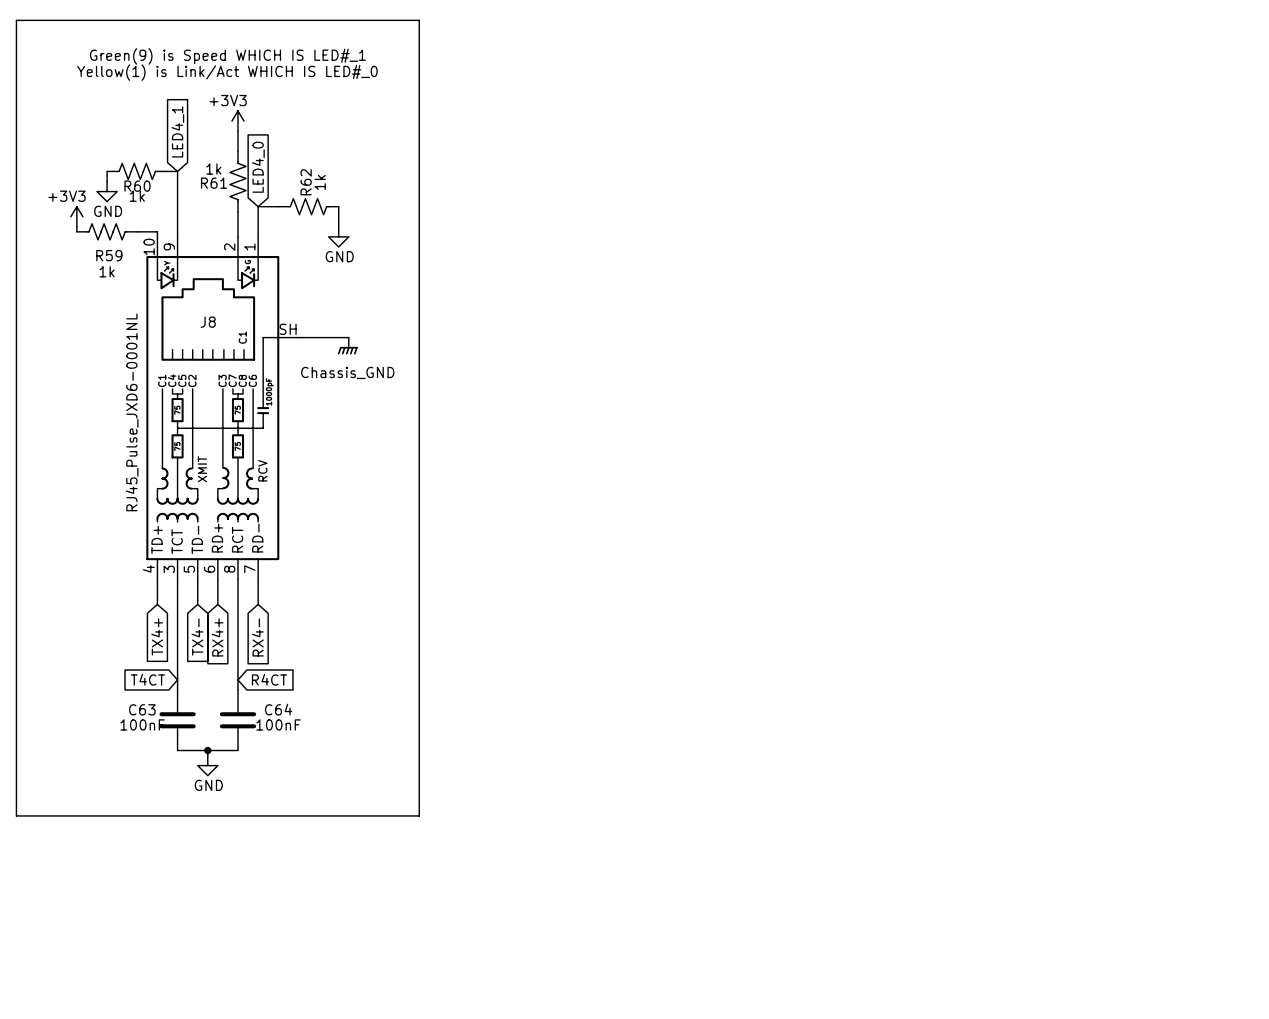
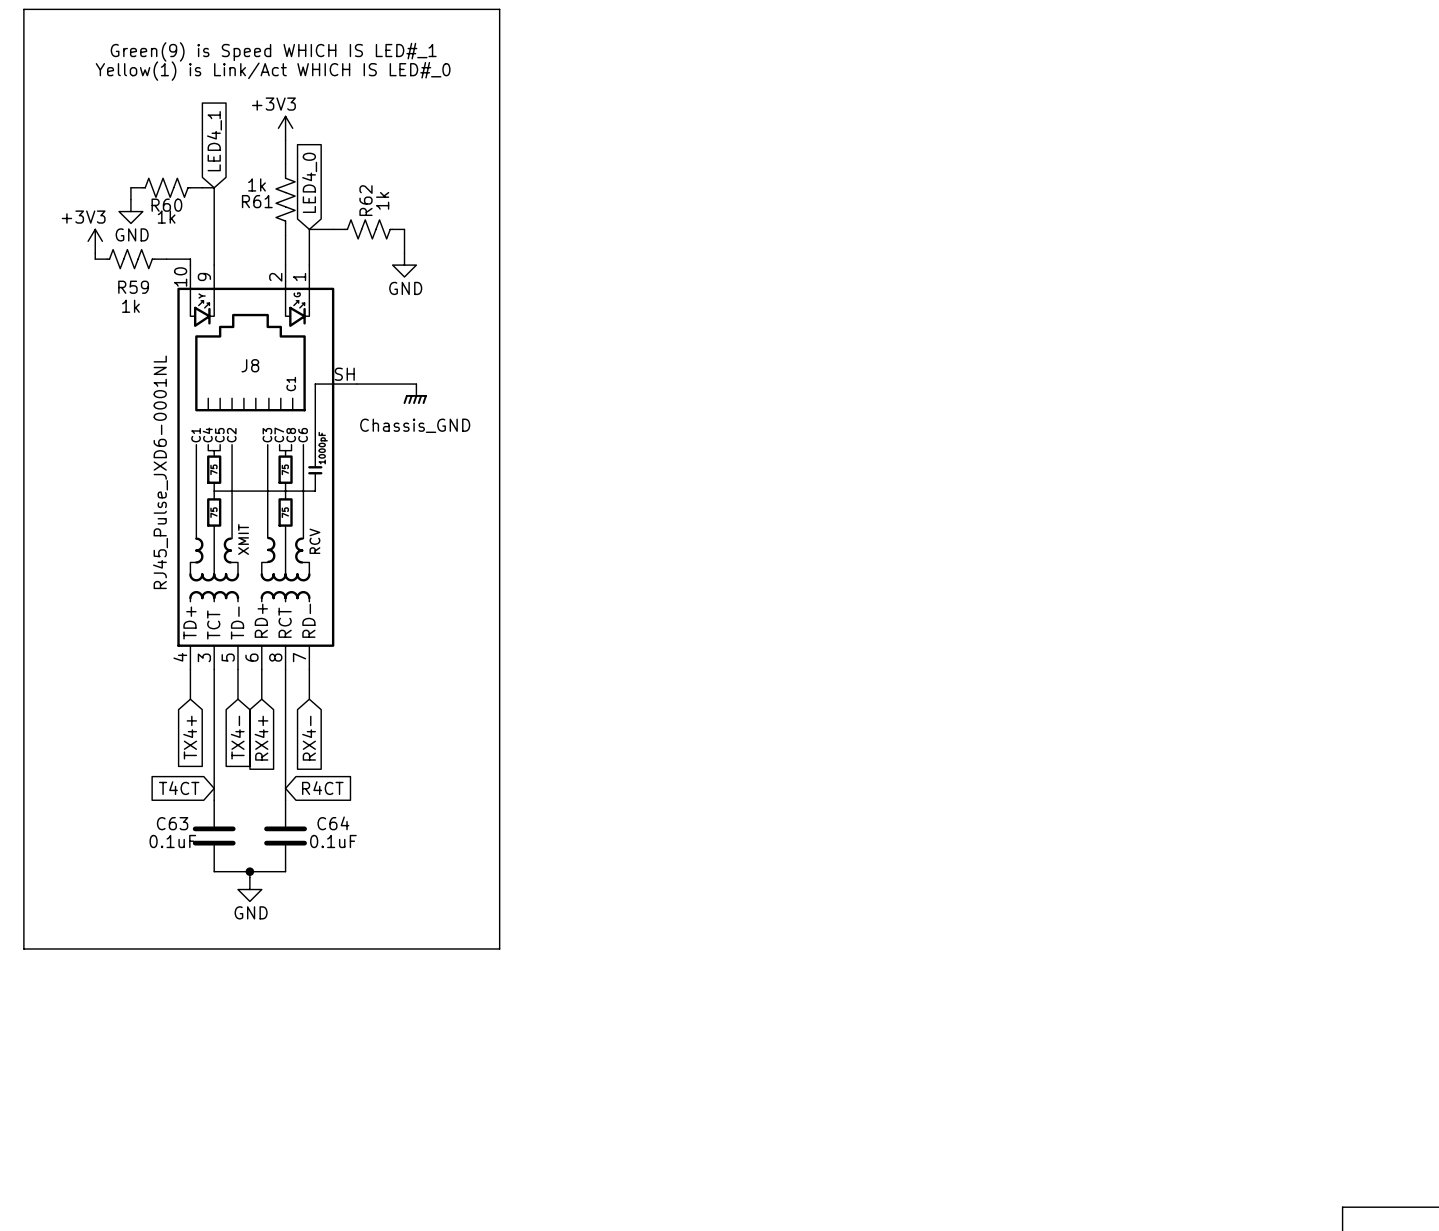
C63 value: 100nF (142, 724) -> 0.1uF (172, 841)
C64 value: 100nF (278, 724) -> 0.1uF (333, 841)

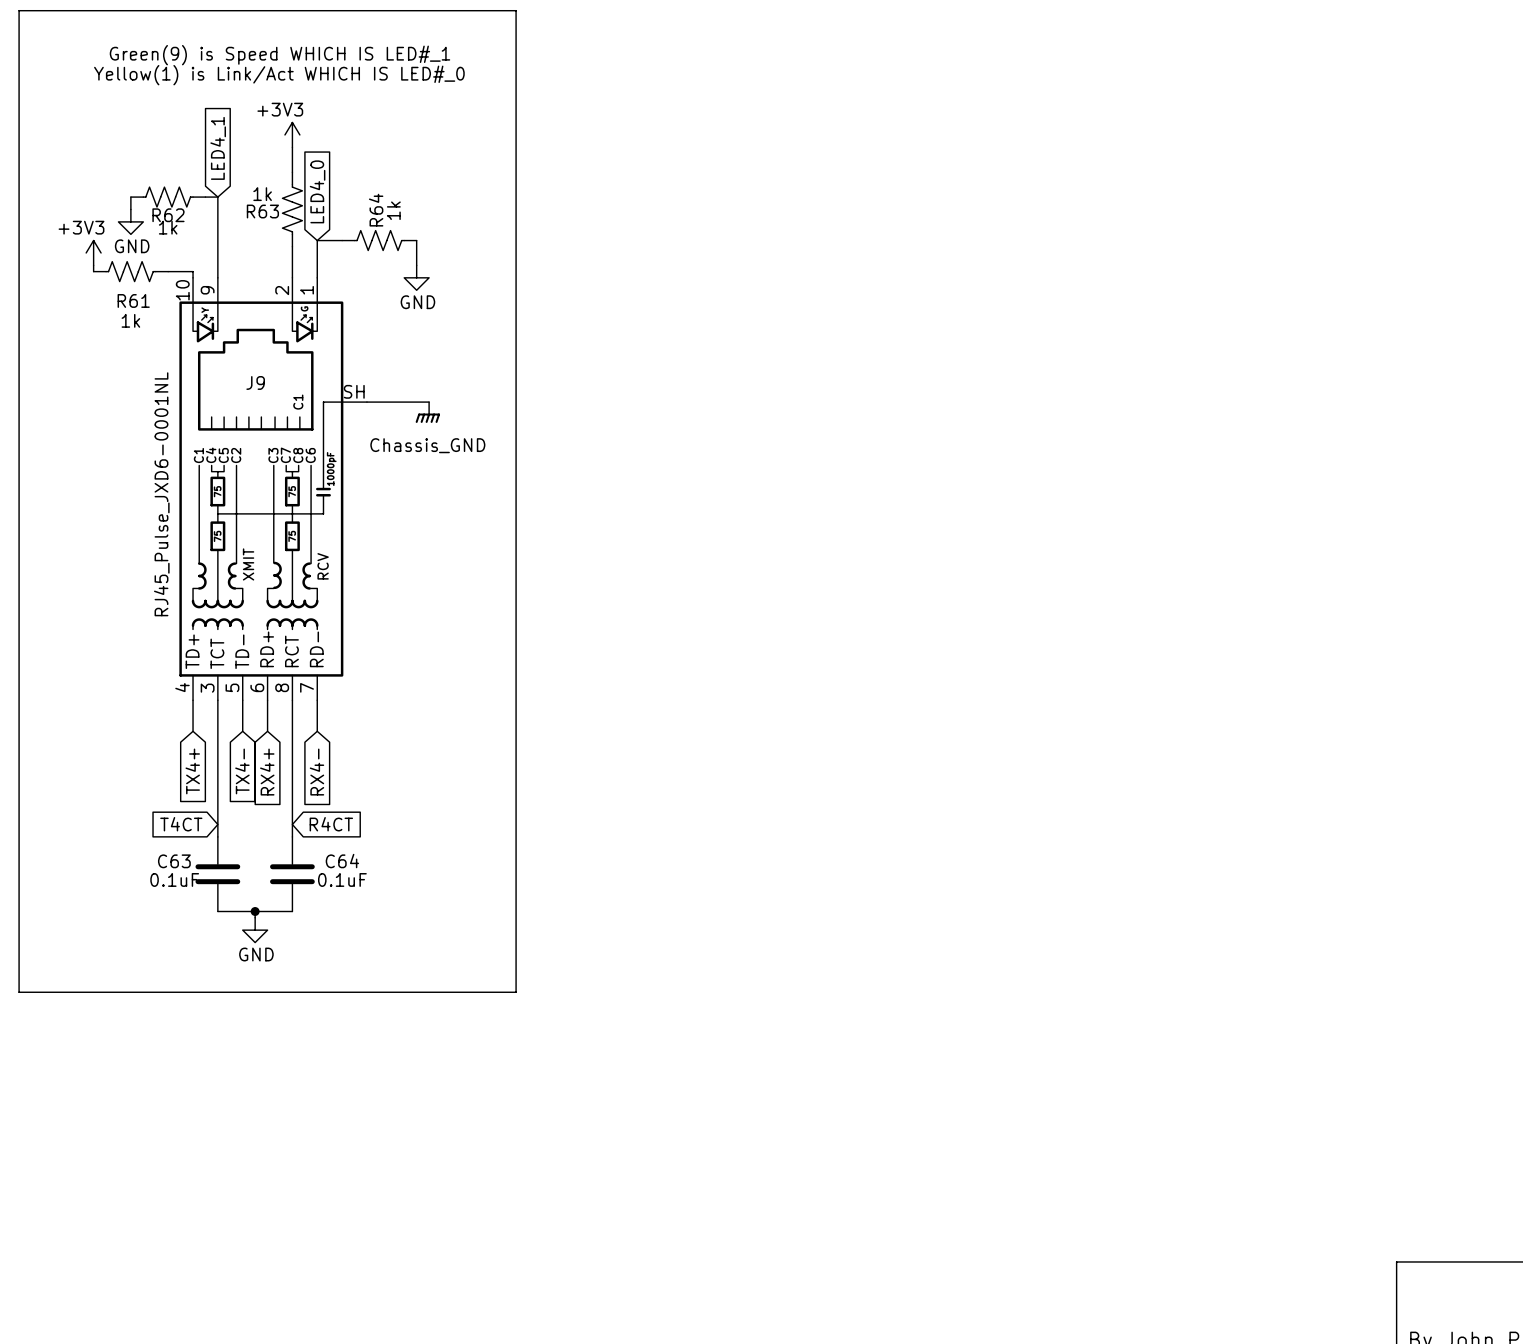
R62 name: R62 (366, 200) -> R64 (376, 210)
R61 name: R61 (257, 201) -> R63 (262, 211)
R60 name: R60 (166, 205) -> R62 (168, 215)
R59 name: R59 (133, 287) -> R61 (133, 300)
J8 name: J8 (250, 365) -> J9 (255, 382)

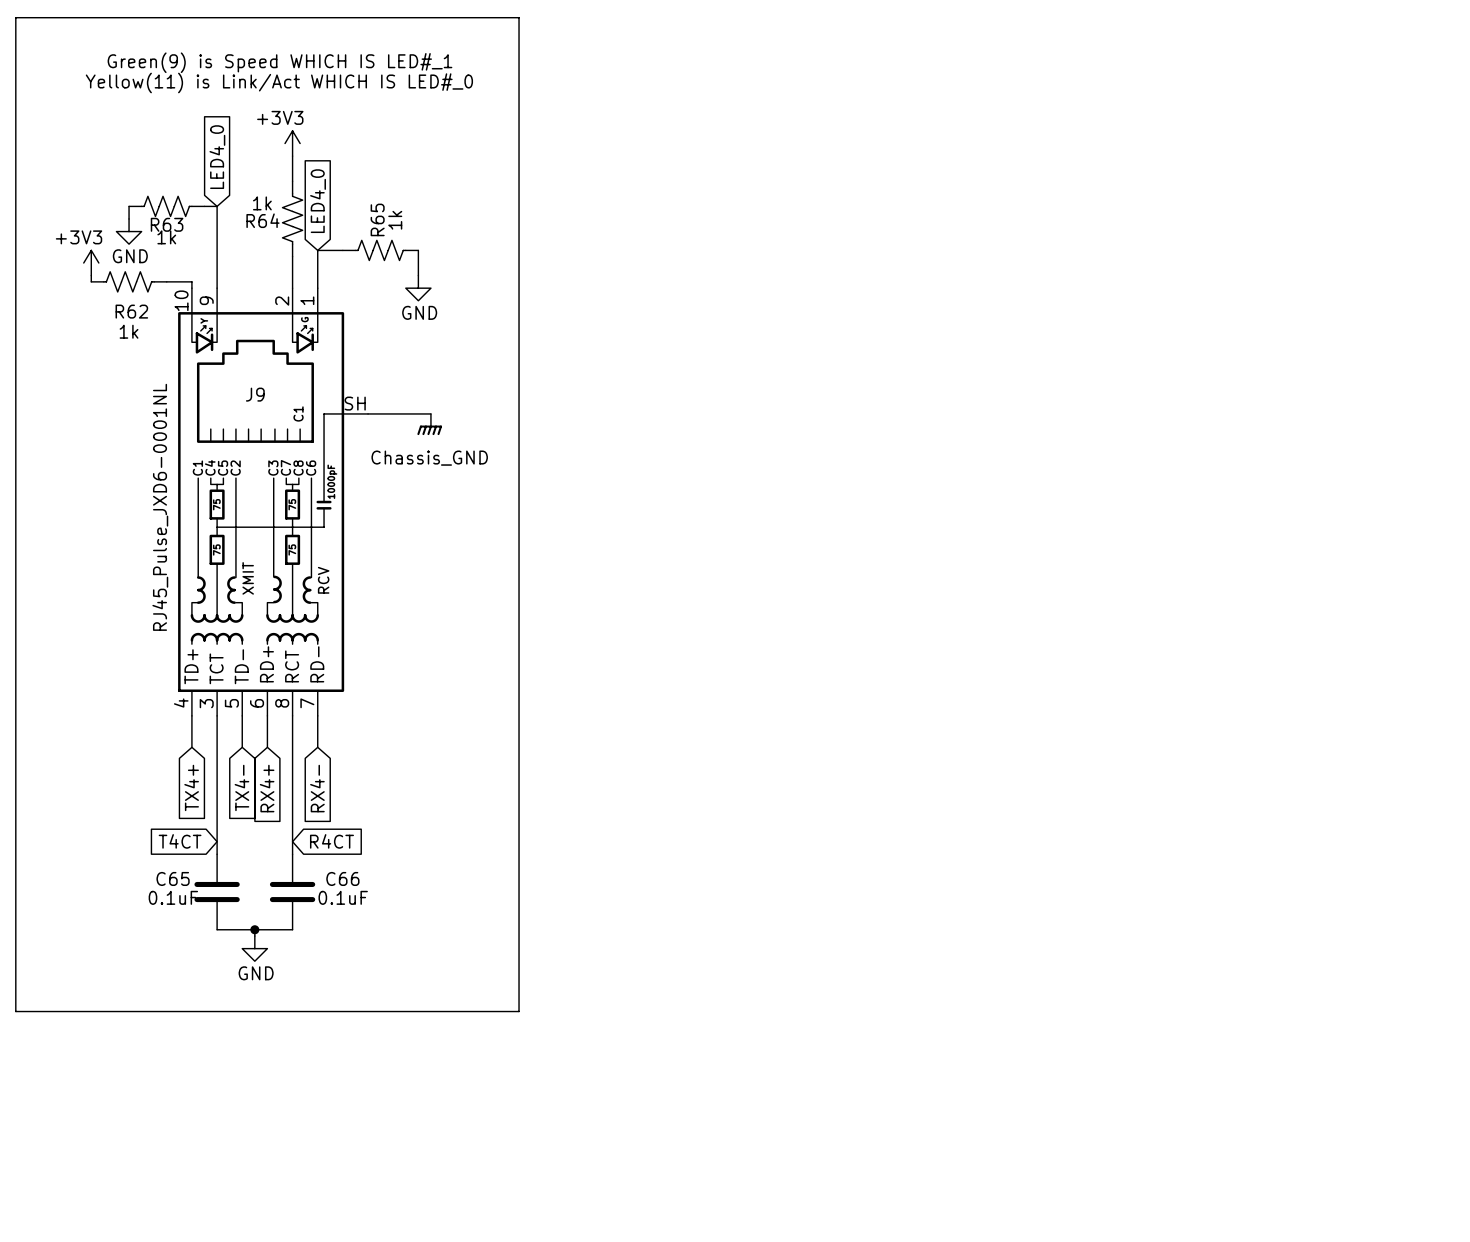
text: Yellow(1) is Link/Act WHICH IS LED#_0 (279, 75) -> Yellow(11) is Link/Act WHICH IS LED#_0 (279, 82)
global label: LED4_1 (218, 148) -> LED4_0 (217, 157)
R64 name: R64 (376, 210) -> R65 (377, 219)
R63 name: R63 (262, 211) -> R64 (262, 220)
R62 name: R62 (168, 215) -> R63 (167, 224)
R61 name: R61 (133, 300) -> R62 (131, 311)
C63 name: C63 (174, 861) -> C65 (173, 878)
C64 name: C64 (342, 861) -> C66 (342, 878)

